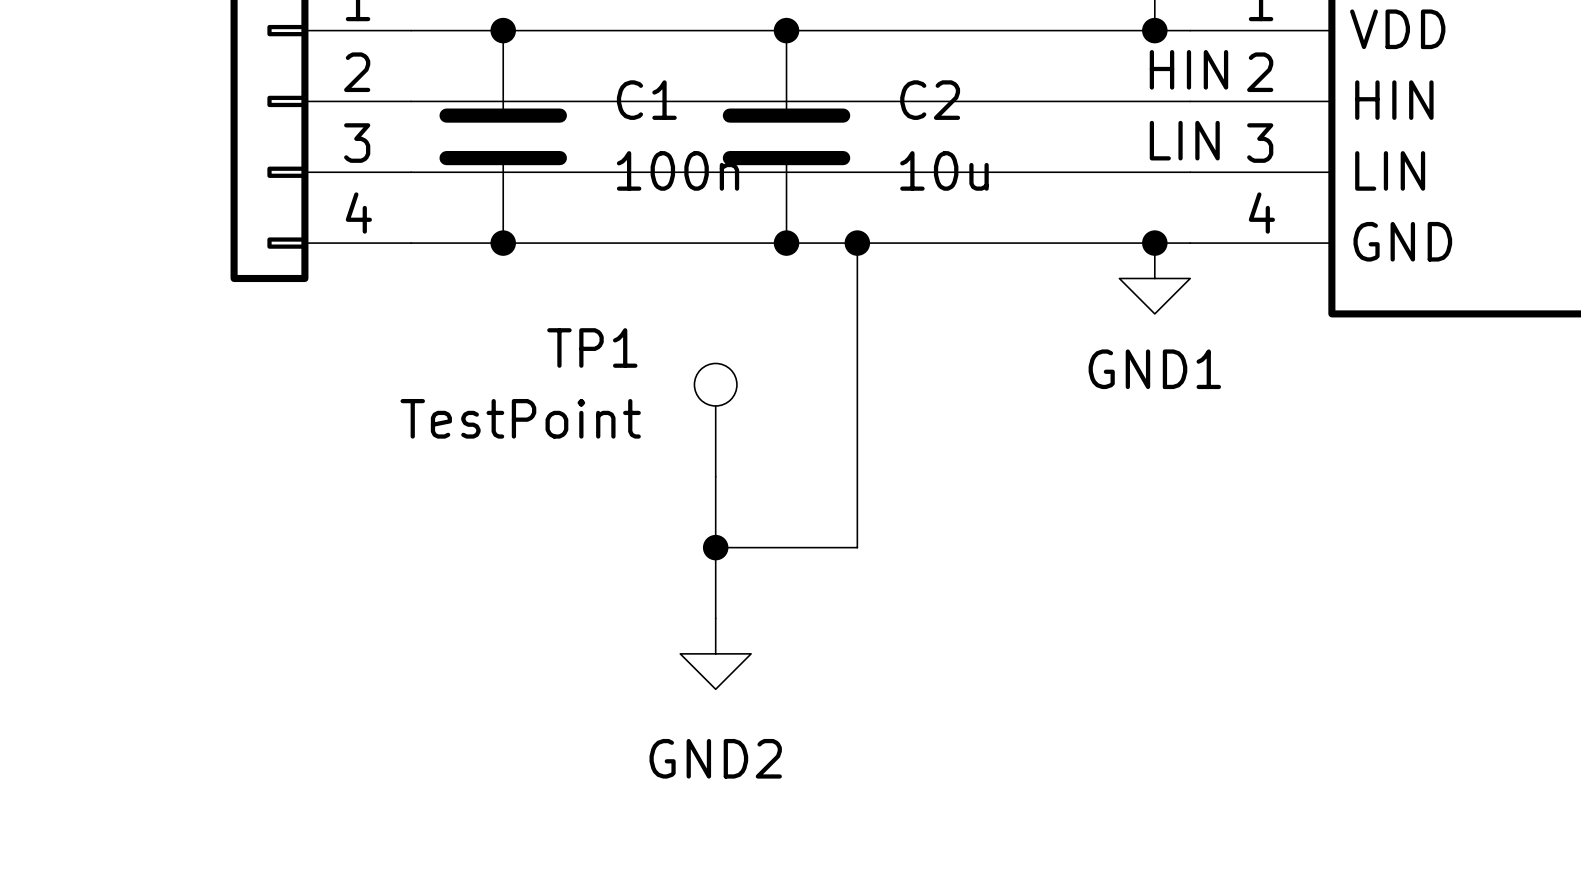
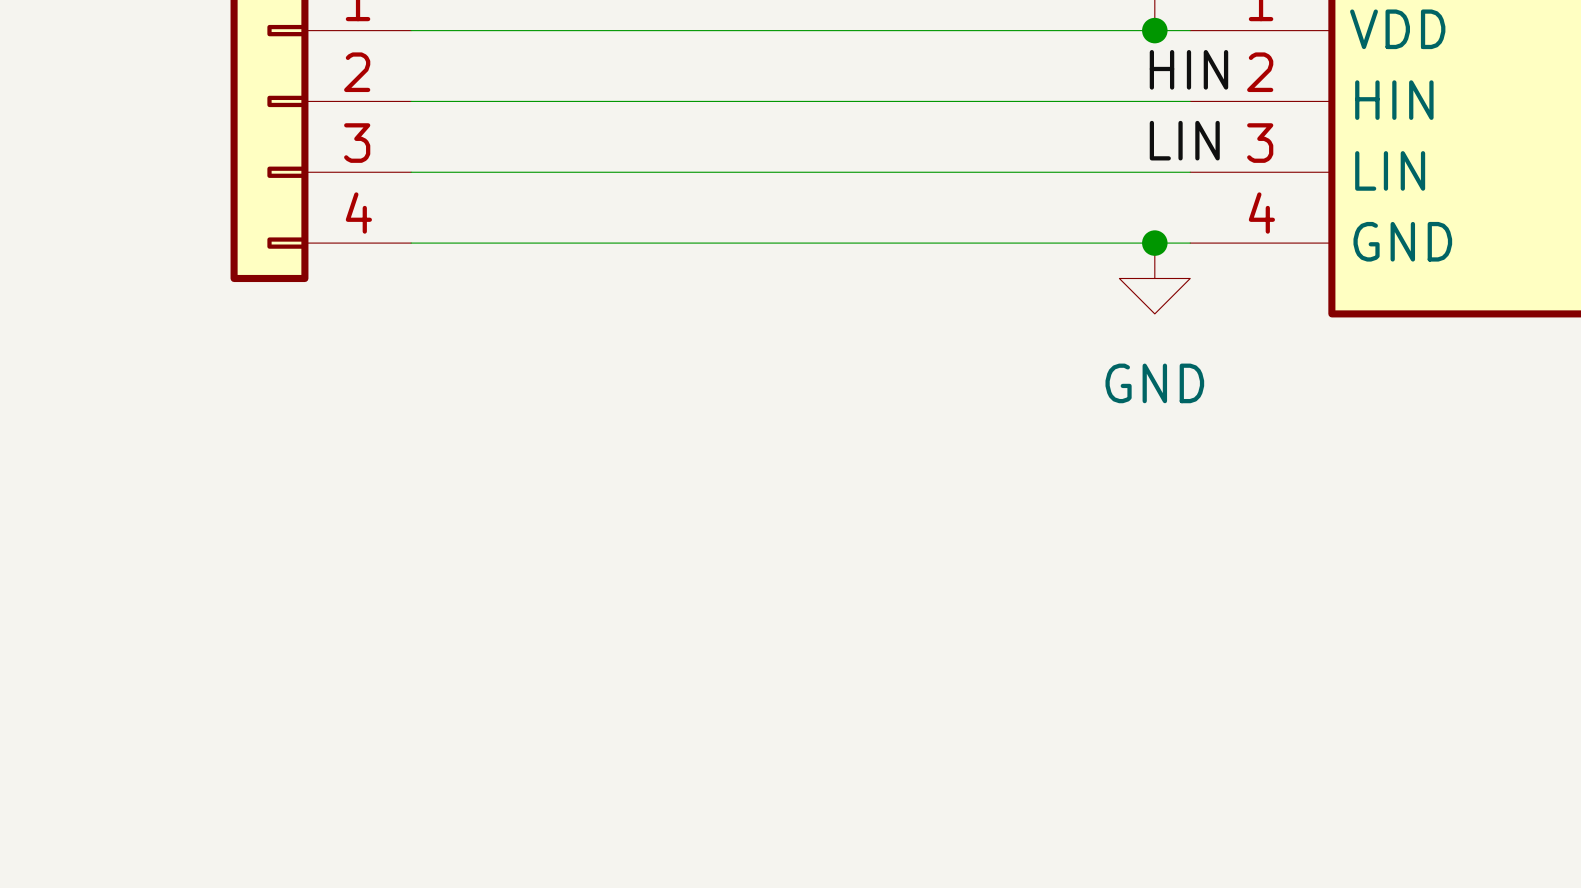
junction: (503, 30) -> none
junction: (786, 30) -> none
C1: 100n (503, 136) -> none
C2: 10u (786, 136) -> none
junction: (503, 243) -> none
junction: (786, 243) -> none
wire: (857, 243) (857, 547) (715, 547) -> none
junction: (857, 243) -> none
power symbol: GND1 (1154, 278) -> GND (1154, 278)
TP1: TestPoint (715, 420) -> none
wire: (715, 476) (715, 618) -> none
junction: (715, 547) -> none
power symbol: GND2 (715, 653) -> none

